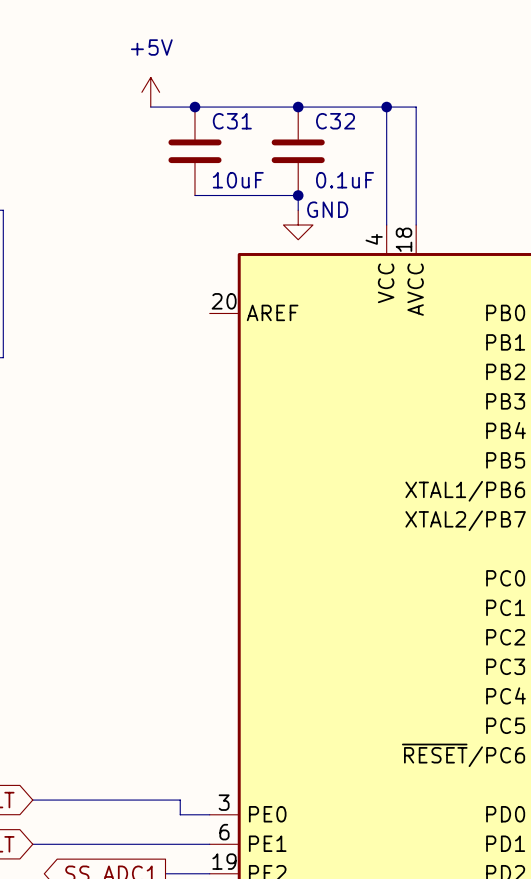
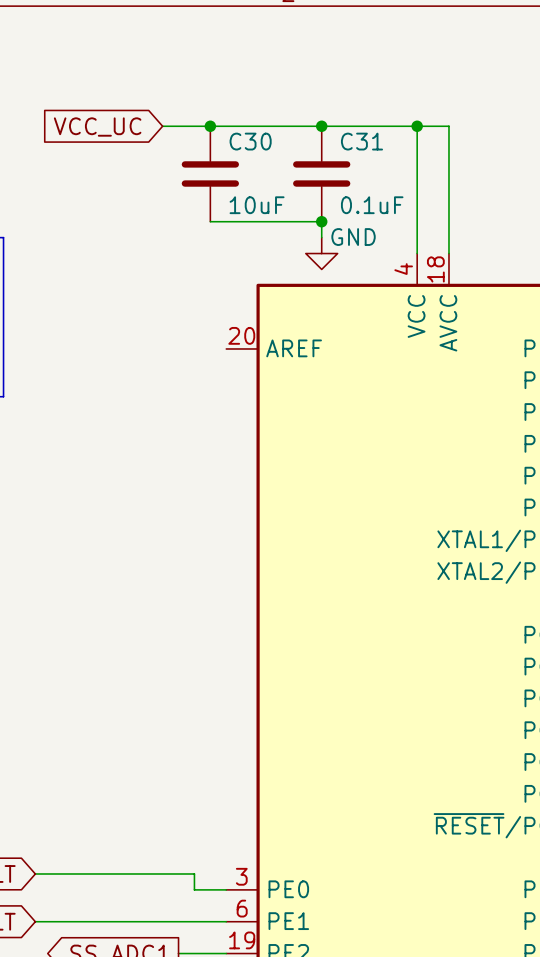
power symbol: +5V (150, 92) -> none
global label: none -> VCC_UC (97, 127)
C31 name: C31 (232, 121) -> C30 (250, 141)
C32 name: C32 (335, 121) -> C31 (361, 141)

